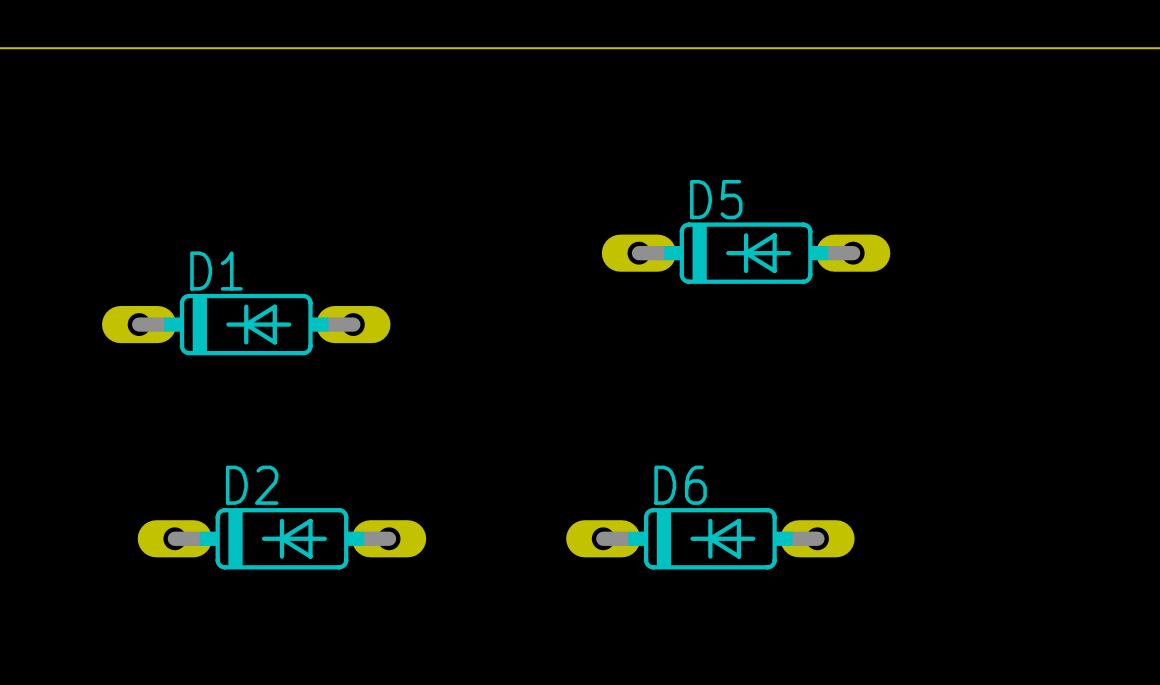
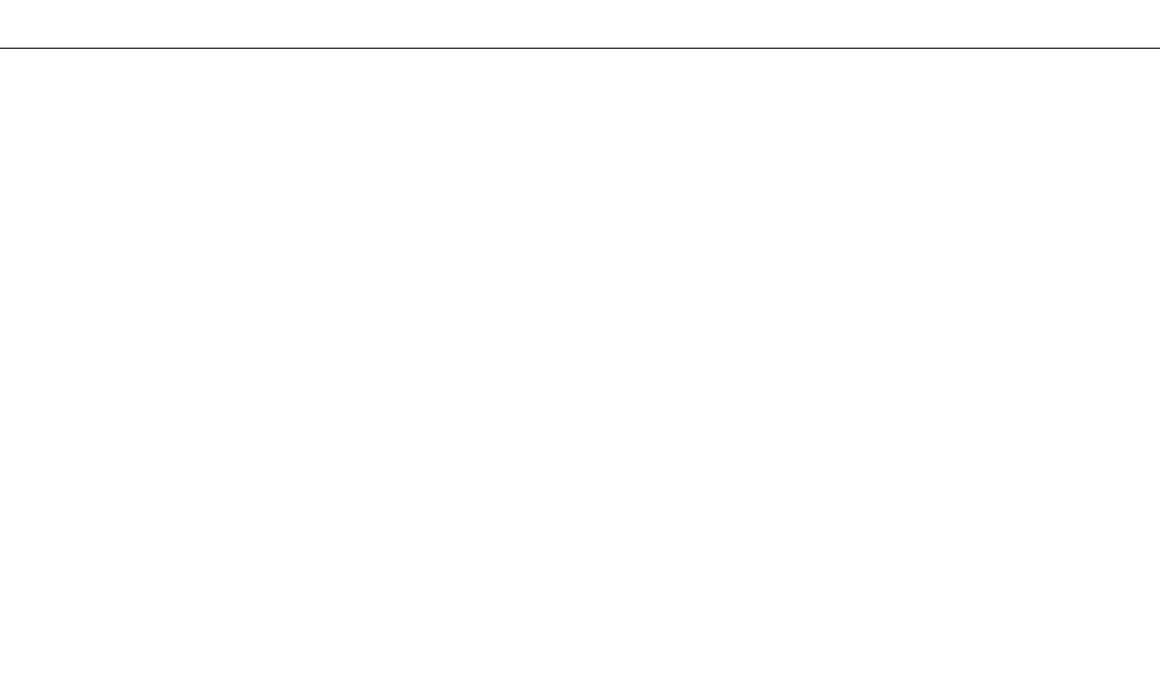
D5: (746, 253) -> none
D1: (246, 324) -> none
D2: (281, 538) -> none
D6: (710, 538) -> none

